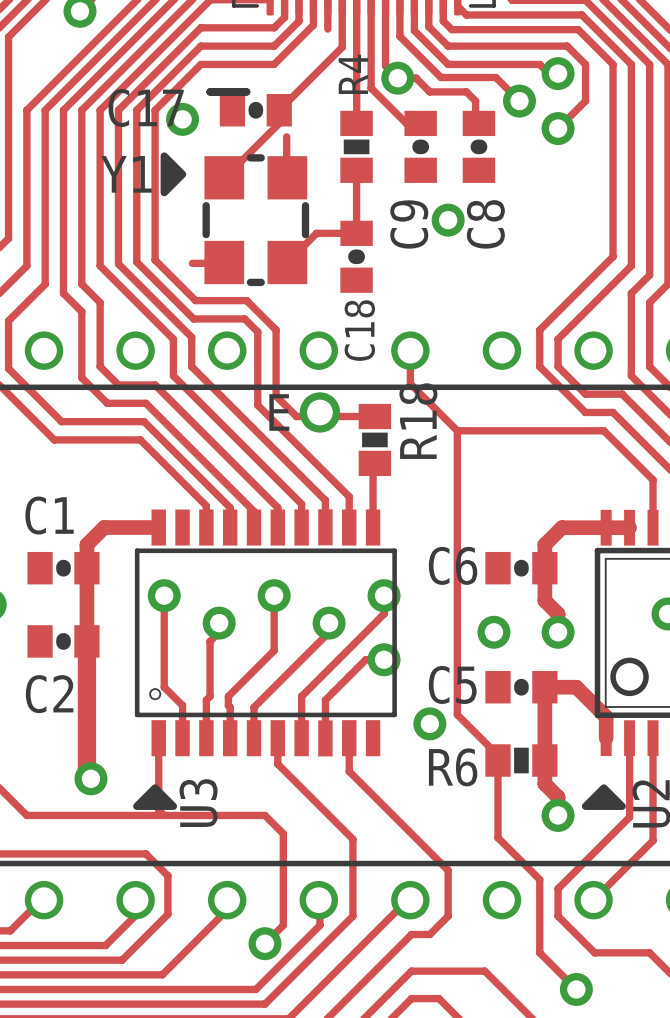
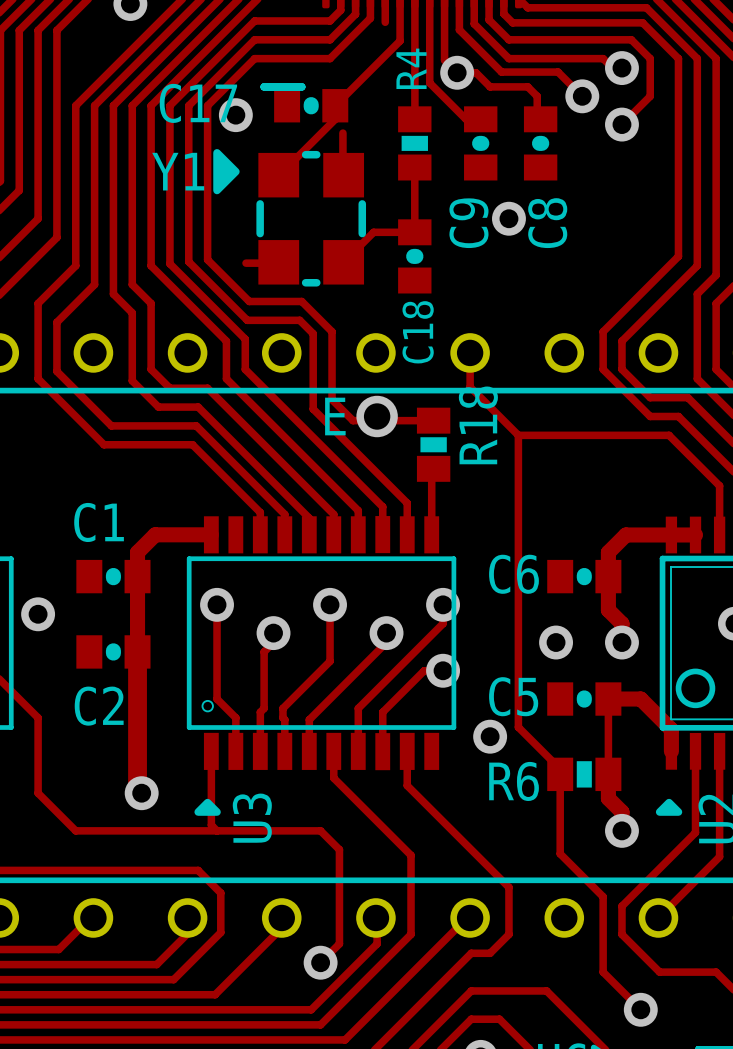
track width: thick (544, 687) (544, 760) -> thin (608, 699) (608, 774)
drawing shape: [133, 784, 178, 810] -> [194, 798, 221, 816]
drawing shape: [581, 784, 626, 810] -> [655, 798, 683, 816]

